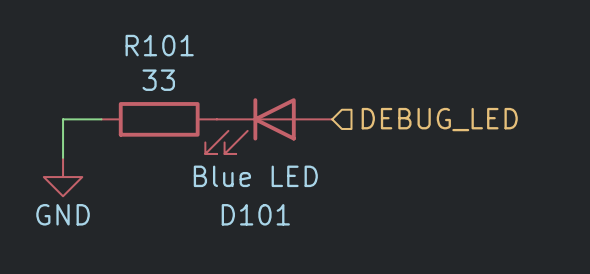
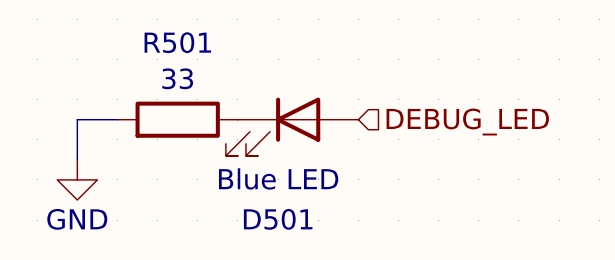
R101 name: R101 (159, 45) -> R501 (177, 42)
D101 name: D101 (255, 214) -> D501 (278, 219)

